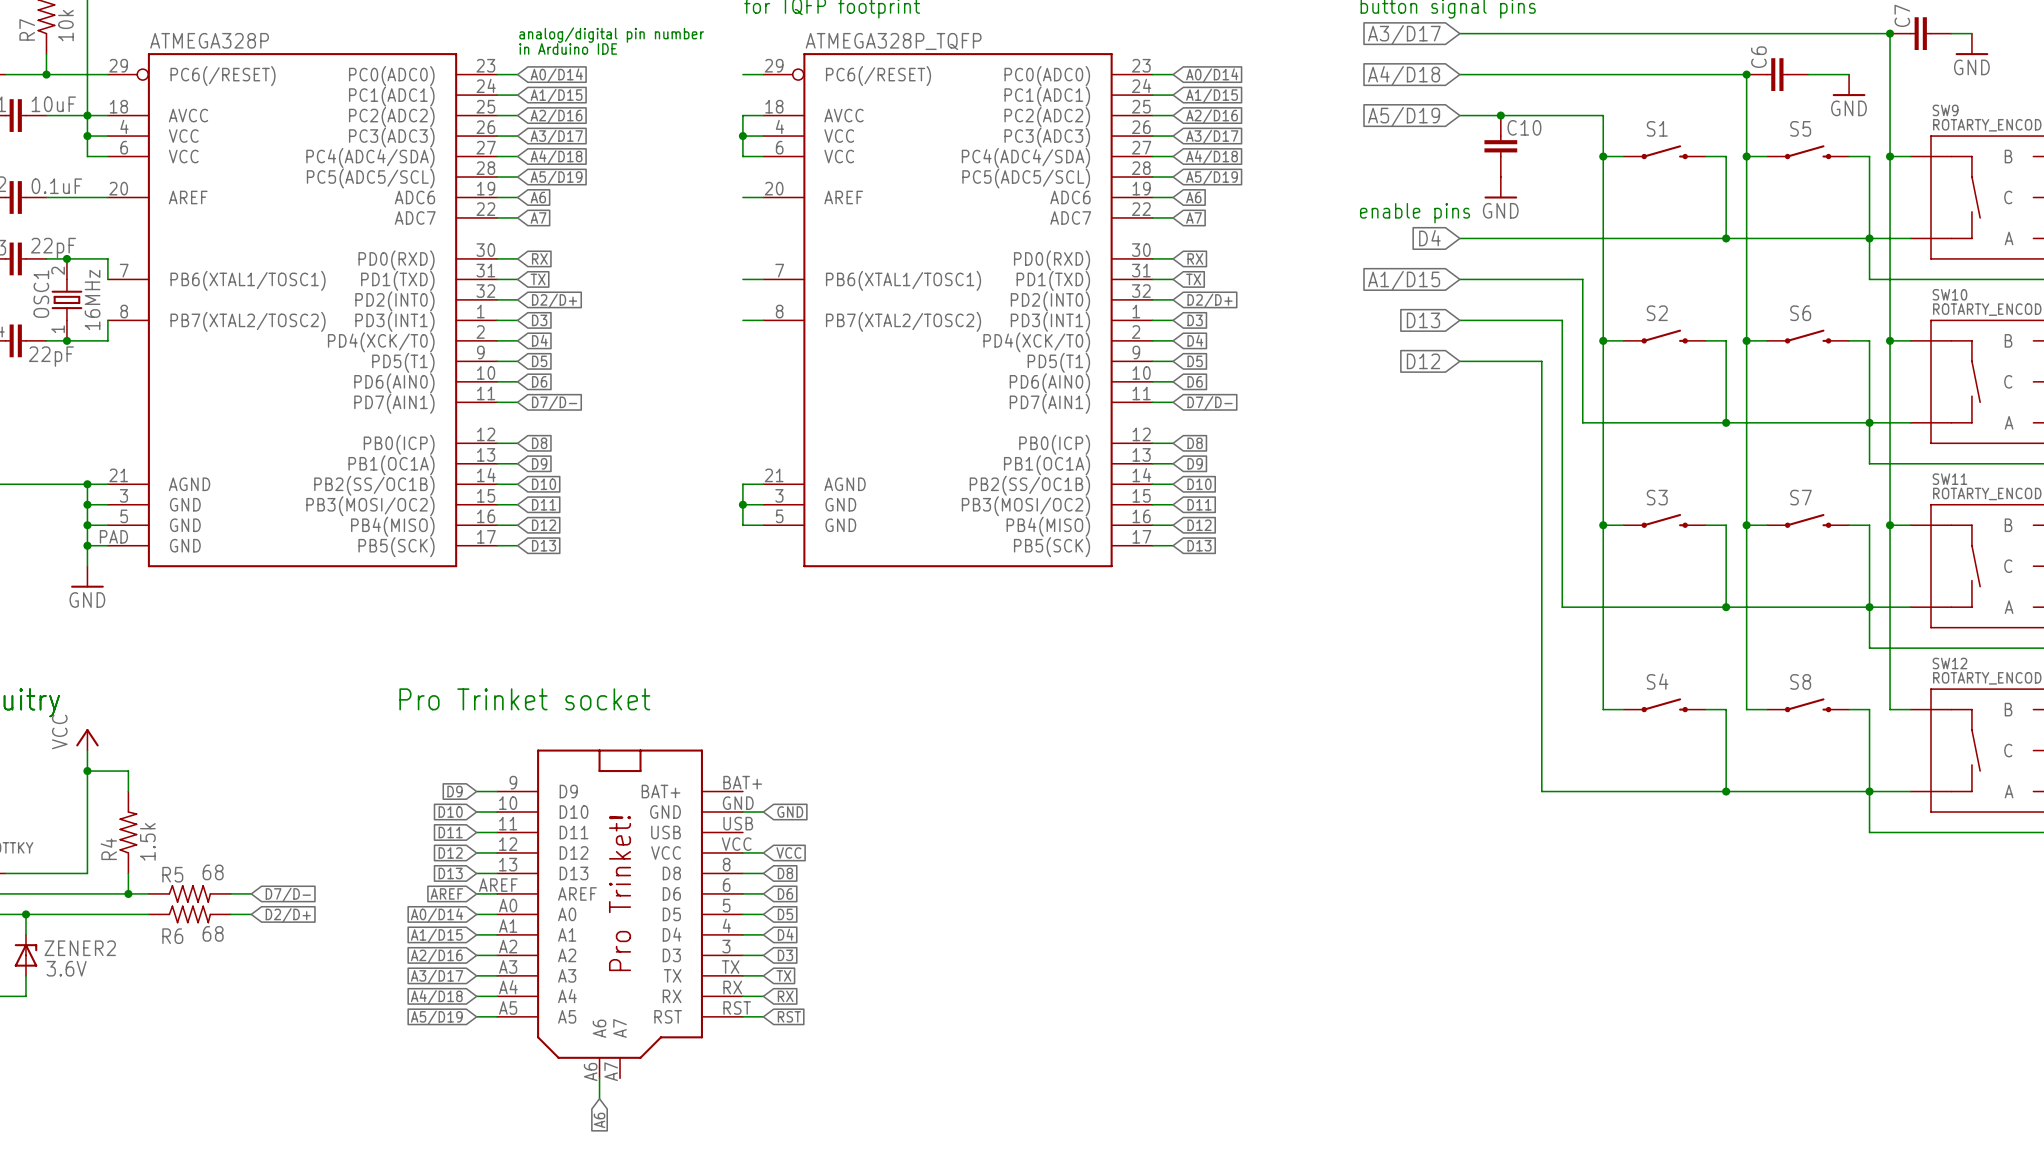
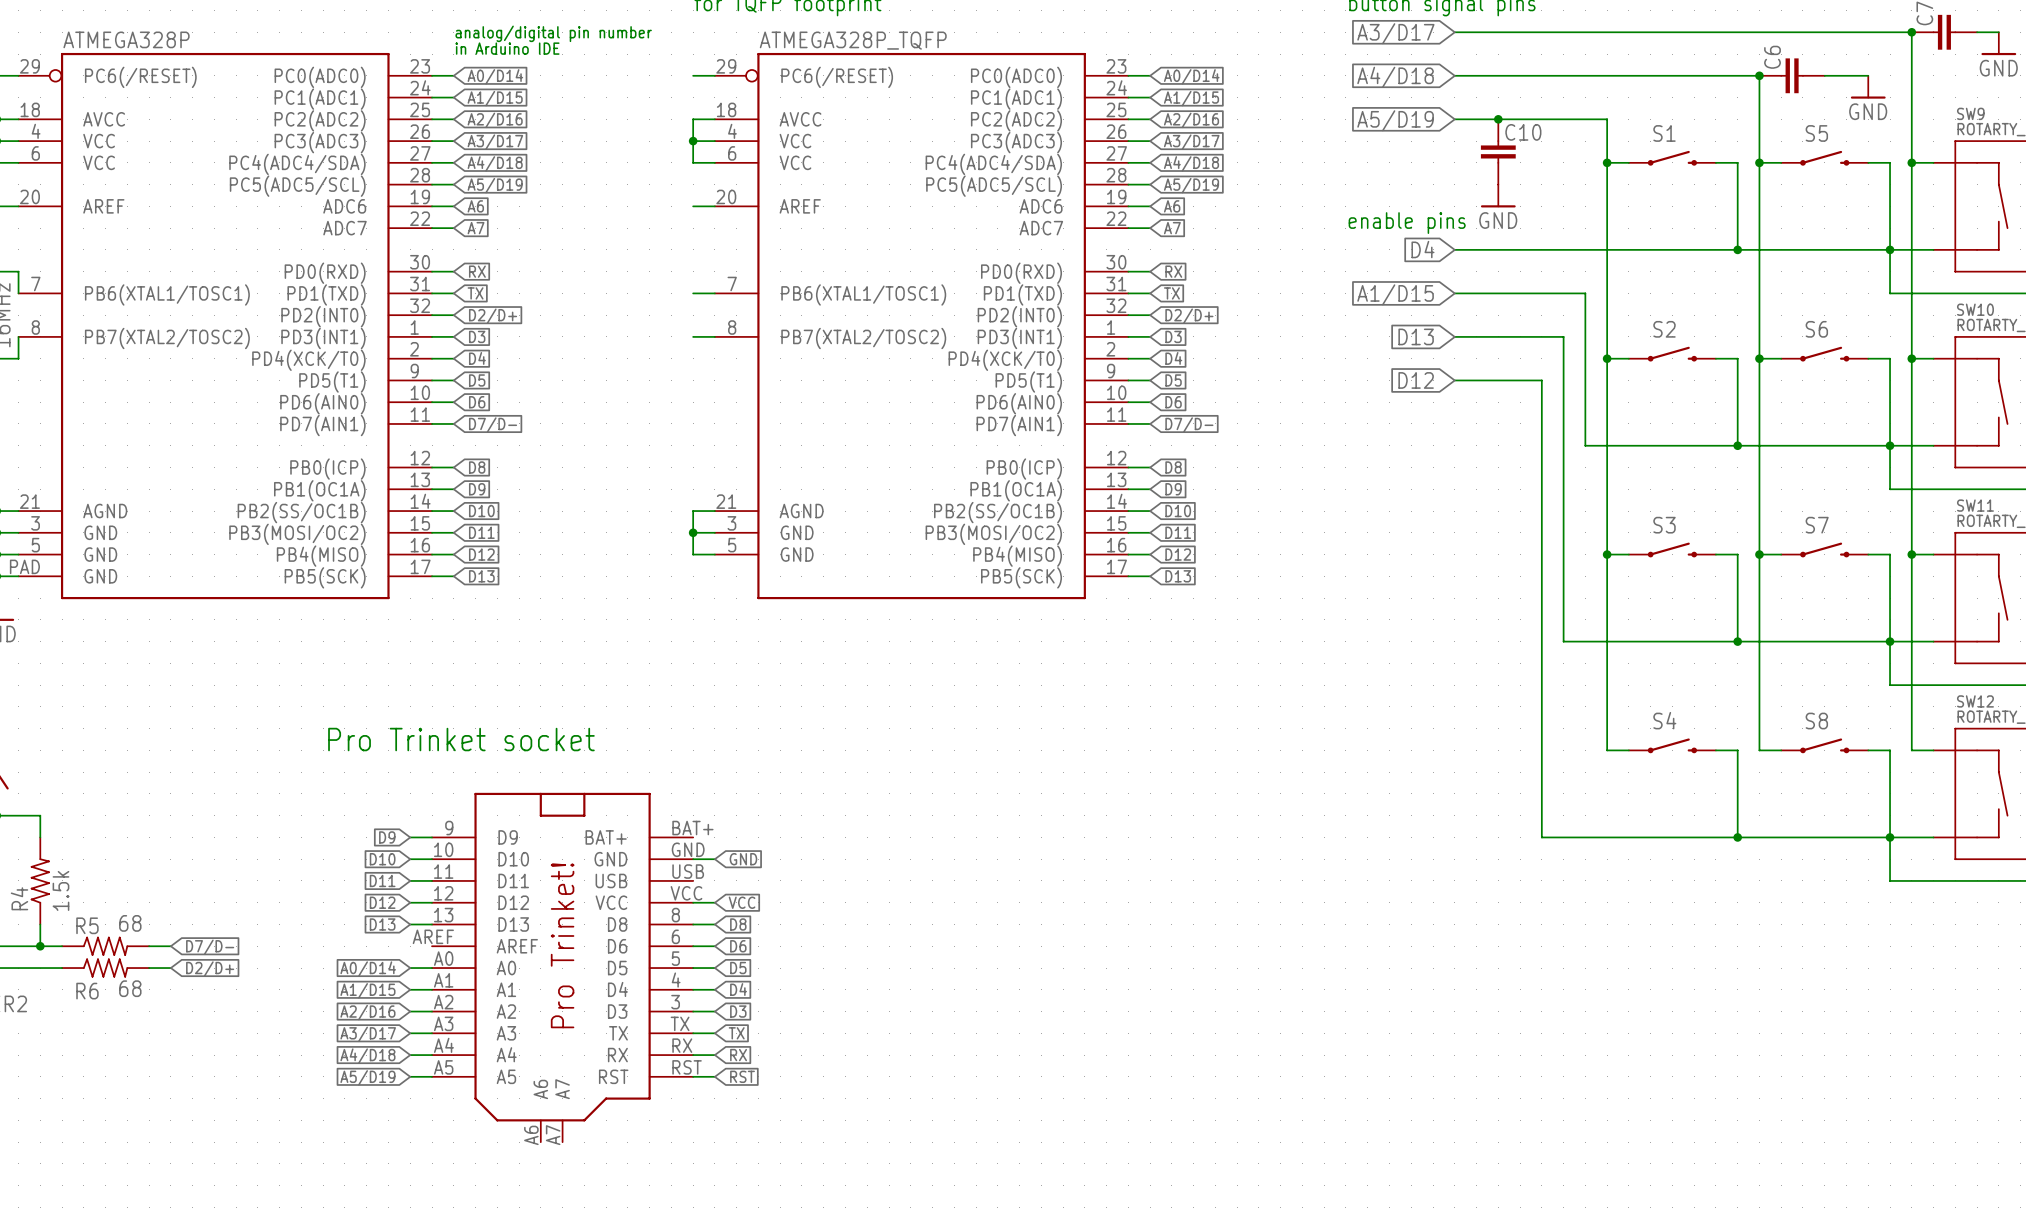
global label: AREF (446, 893) -> none
wire: (476, 893) (497, 893) -> none
wire: (599, 1078) (599, 1098) -> none
global label: A6 (599, 1120) -> none

